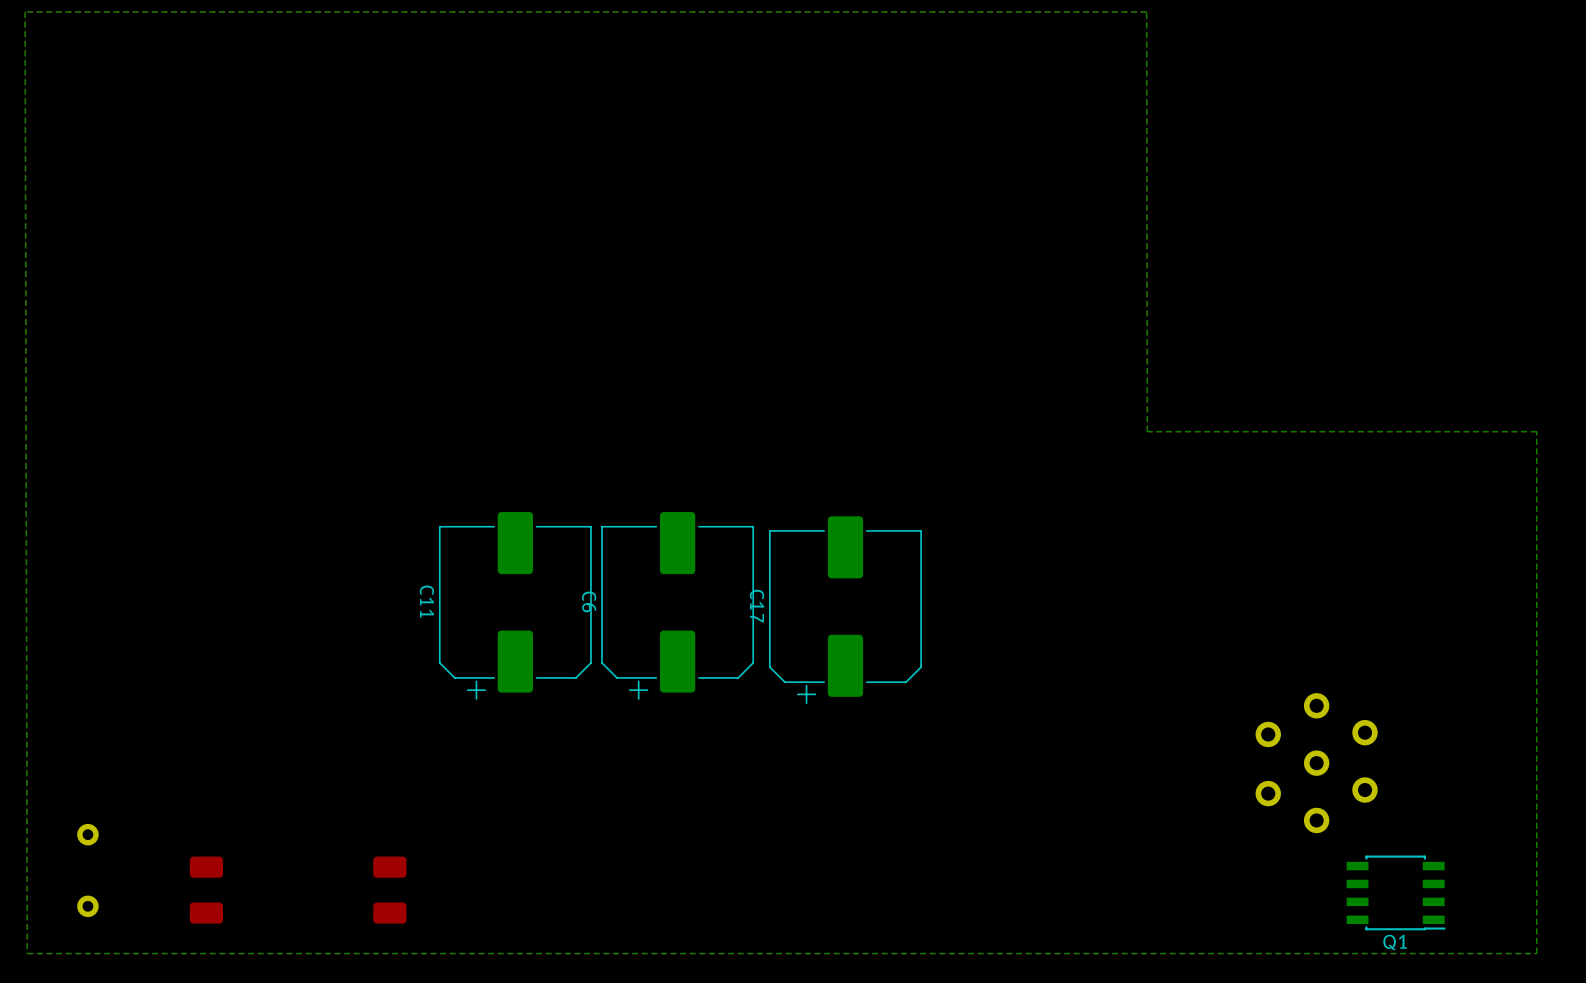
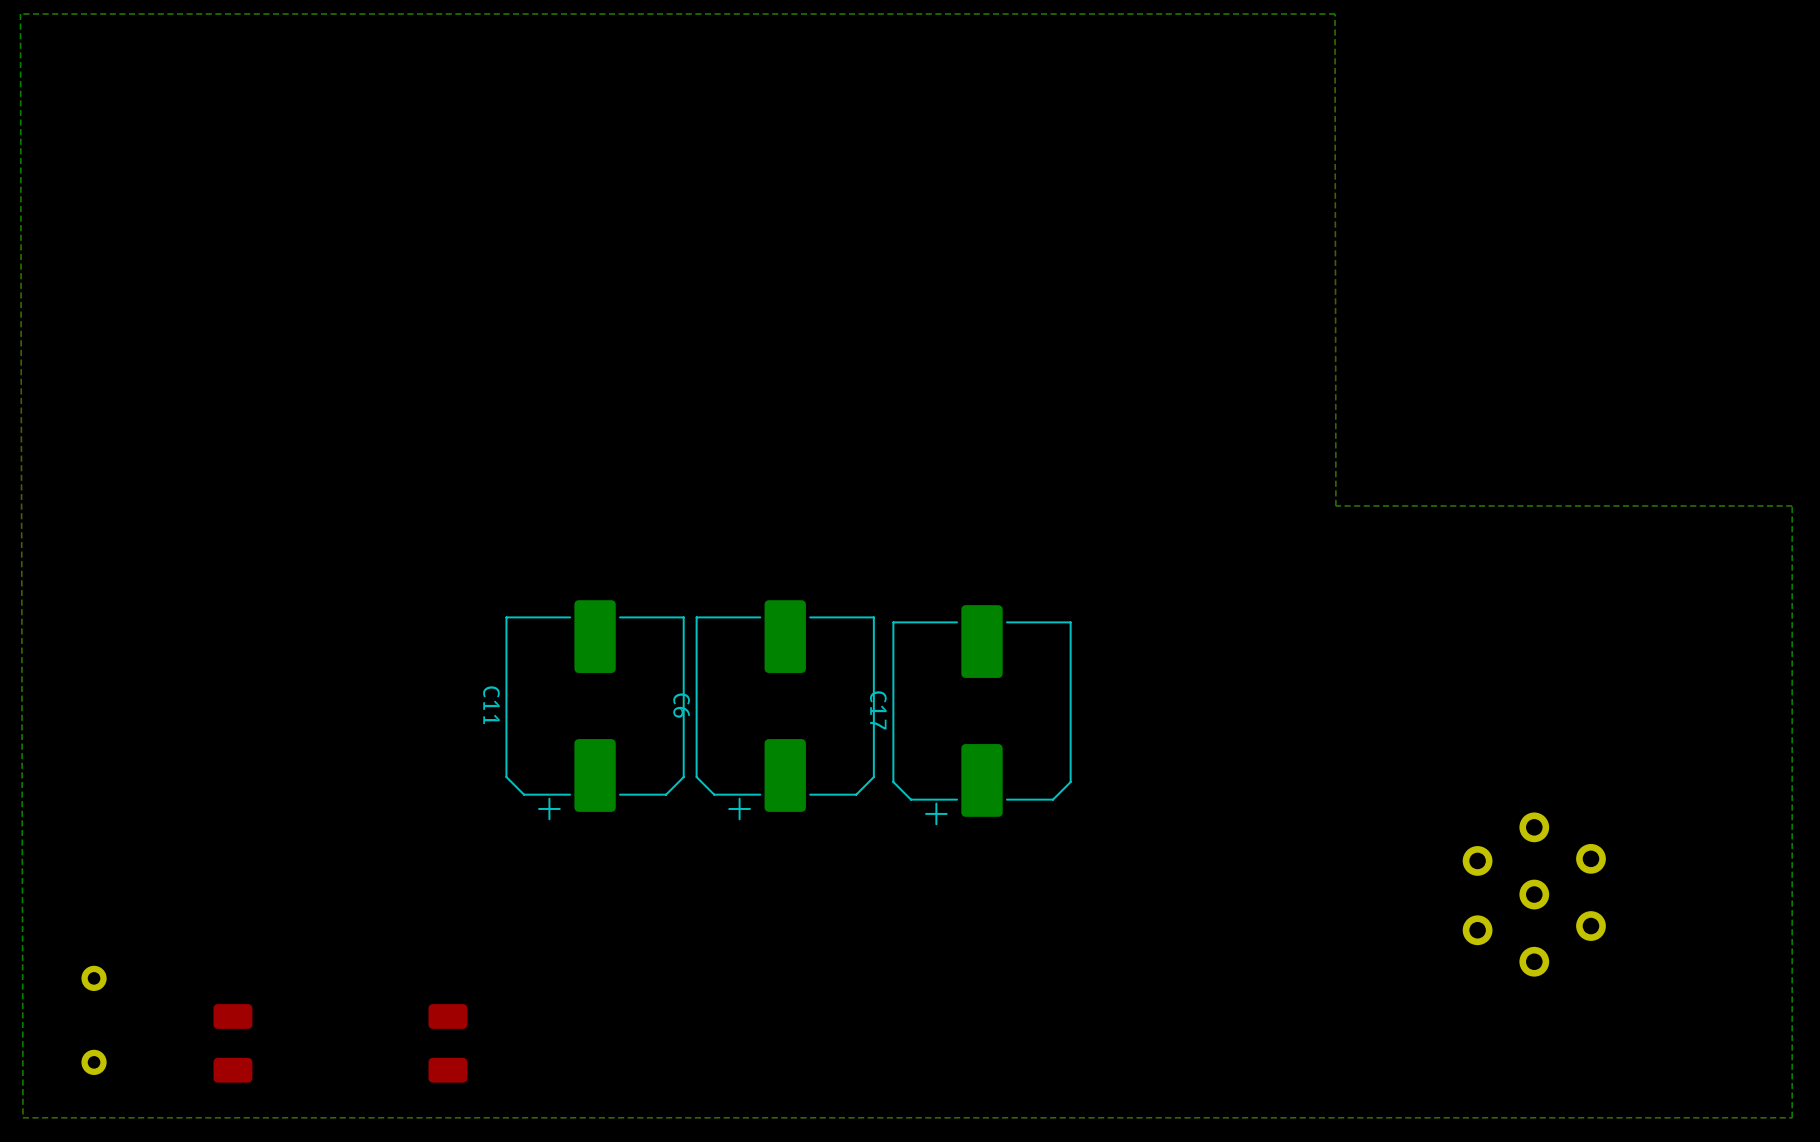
Q1: (1396, 892) -> none

